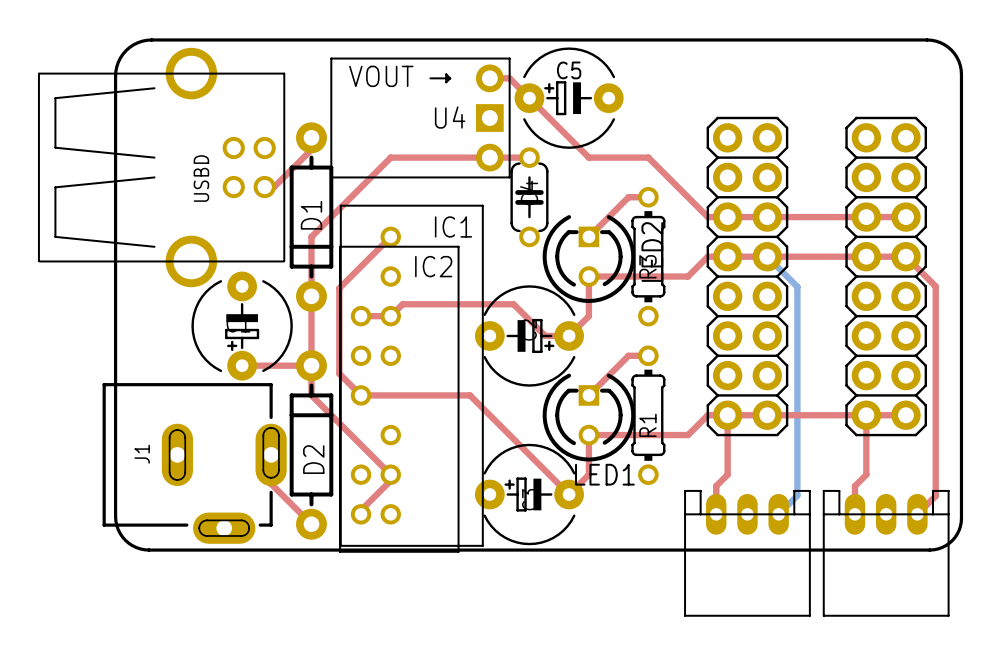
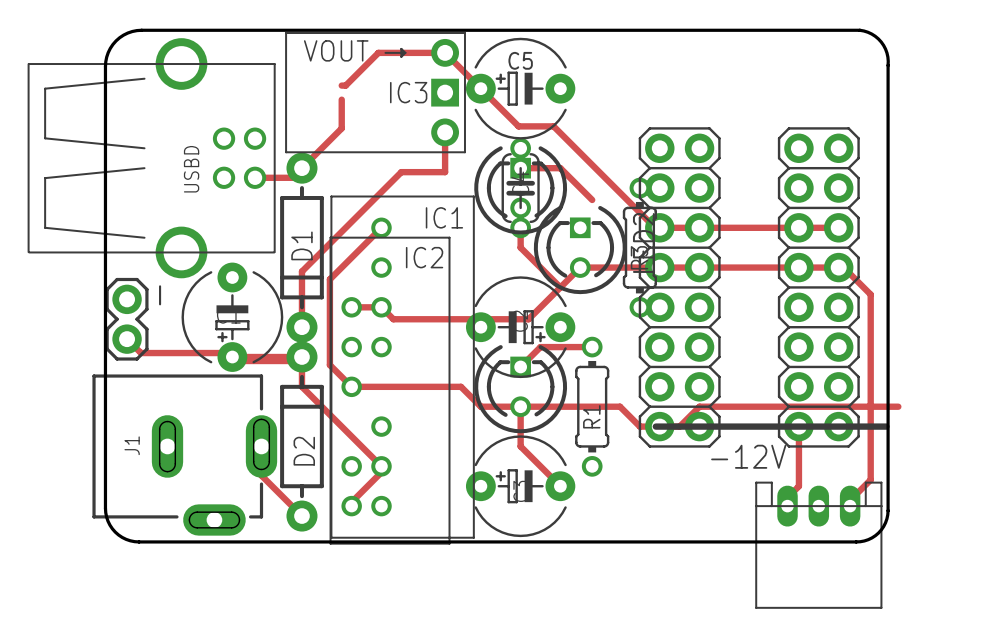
board edge: (867, 39) (935, 41) (951, 50) (958, 61) (961, 69) (961, 518) (960, 526) (954, 537) (945, 545) (937, 548) (864, 550) -> (859, 30) (871, 34) (881, 41) (885, 49) (888, 61) (888, 510) (885, 522) (878, 532) (868, 539) (856, 541)
top track: (489, 78) (509, 78) (588, 157) (648, 157) (707, 217) (906, 217) -> none
top track: none -> (341, 85) (345, 85) (378, 52) (445, 52) (518, 126) (553, 126) (655, 227) (838, 227)
C5 position: (569, 98) -> (520, 88)
IC3: none -> (375, 92)
U4: (420, 117) -> none
top track: (311, 137) (311, 149) (274, 187) -> (341, 99) (341, 128) (292, 177) (264, 177)
top track: (529, 157) (390, 157) (311, 236) (311, 280) -> (445, 132) (445, 172) (401, 172) (301, 271)
top track: none -> (520, 168) (560, 168) (592, 199)
top track: (648, 197) (628, 197) (588, 236) -> none
part: none -> (520, 190)
D1 position: (311, 217) -> (301, 247)
top track: none -> (520, 207) (520, 247) (560, 287)
bottom track: (767, 256) (797, 286) (797, 495) (778, 514) -> none
top track: (588, 276) (588, 316) (569, 335) (545, 335) (513, 304) (402, 304) (390, 316) -> (580, 267) (528, 319) (393, 319) (381, 307)
top track: (688, 276) (707, 256) (906, 256) (935, 286) (935, 495) (917, 514) -> (679, 267) (843, 267) (870, 294) (870, 479) (850, 500) (850, 506)
part: (747, 276) -> none
part: (886, 276) -> none
part: none -> (679, 287)
part: none -> (818, 287)
text: none -> - (160, 295)
part: none -> (127, 319)
top track: none -> (127, 339) (140, 353) (232, 353) (240, 360) (301, 360)
top track: none -> (592, 347) (540, 347) (520, 366)
top track: (648, 355) (628, 355) (588, 395) -> none
part: none -> (520, 389)
top track: (489, 415) (529, 454) -> (520, 406) (520, 446)
R1 position: (648, 415) -> (592, 406)
top track: (727, 415) (727, 474) (716, 486) (716, 514) -> none
top track: (866, 415) (866, 474) (854, 486) (854, 514) -> none
LED1: (588, 417) -> none
top track: (648, 435) (588, 435) (588, 474) (569, 494) -> (639, 426) (620, 406) (480, 406)
line: none -> (655, 426) (886, 426)
top track: none -> (798, 426) (798, 486) (787, 497) (787, 506)
text: none -> -12V (748, 456)
part: (747, 553) -> none
part: none -> (818, 545)
part: (886, 553) -> none

